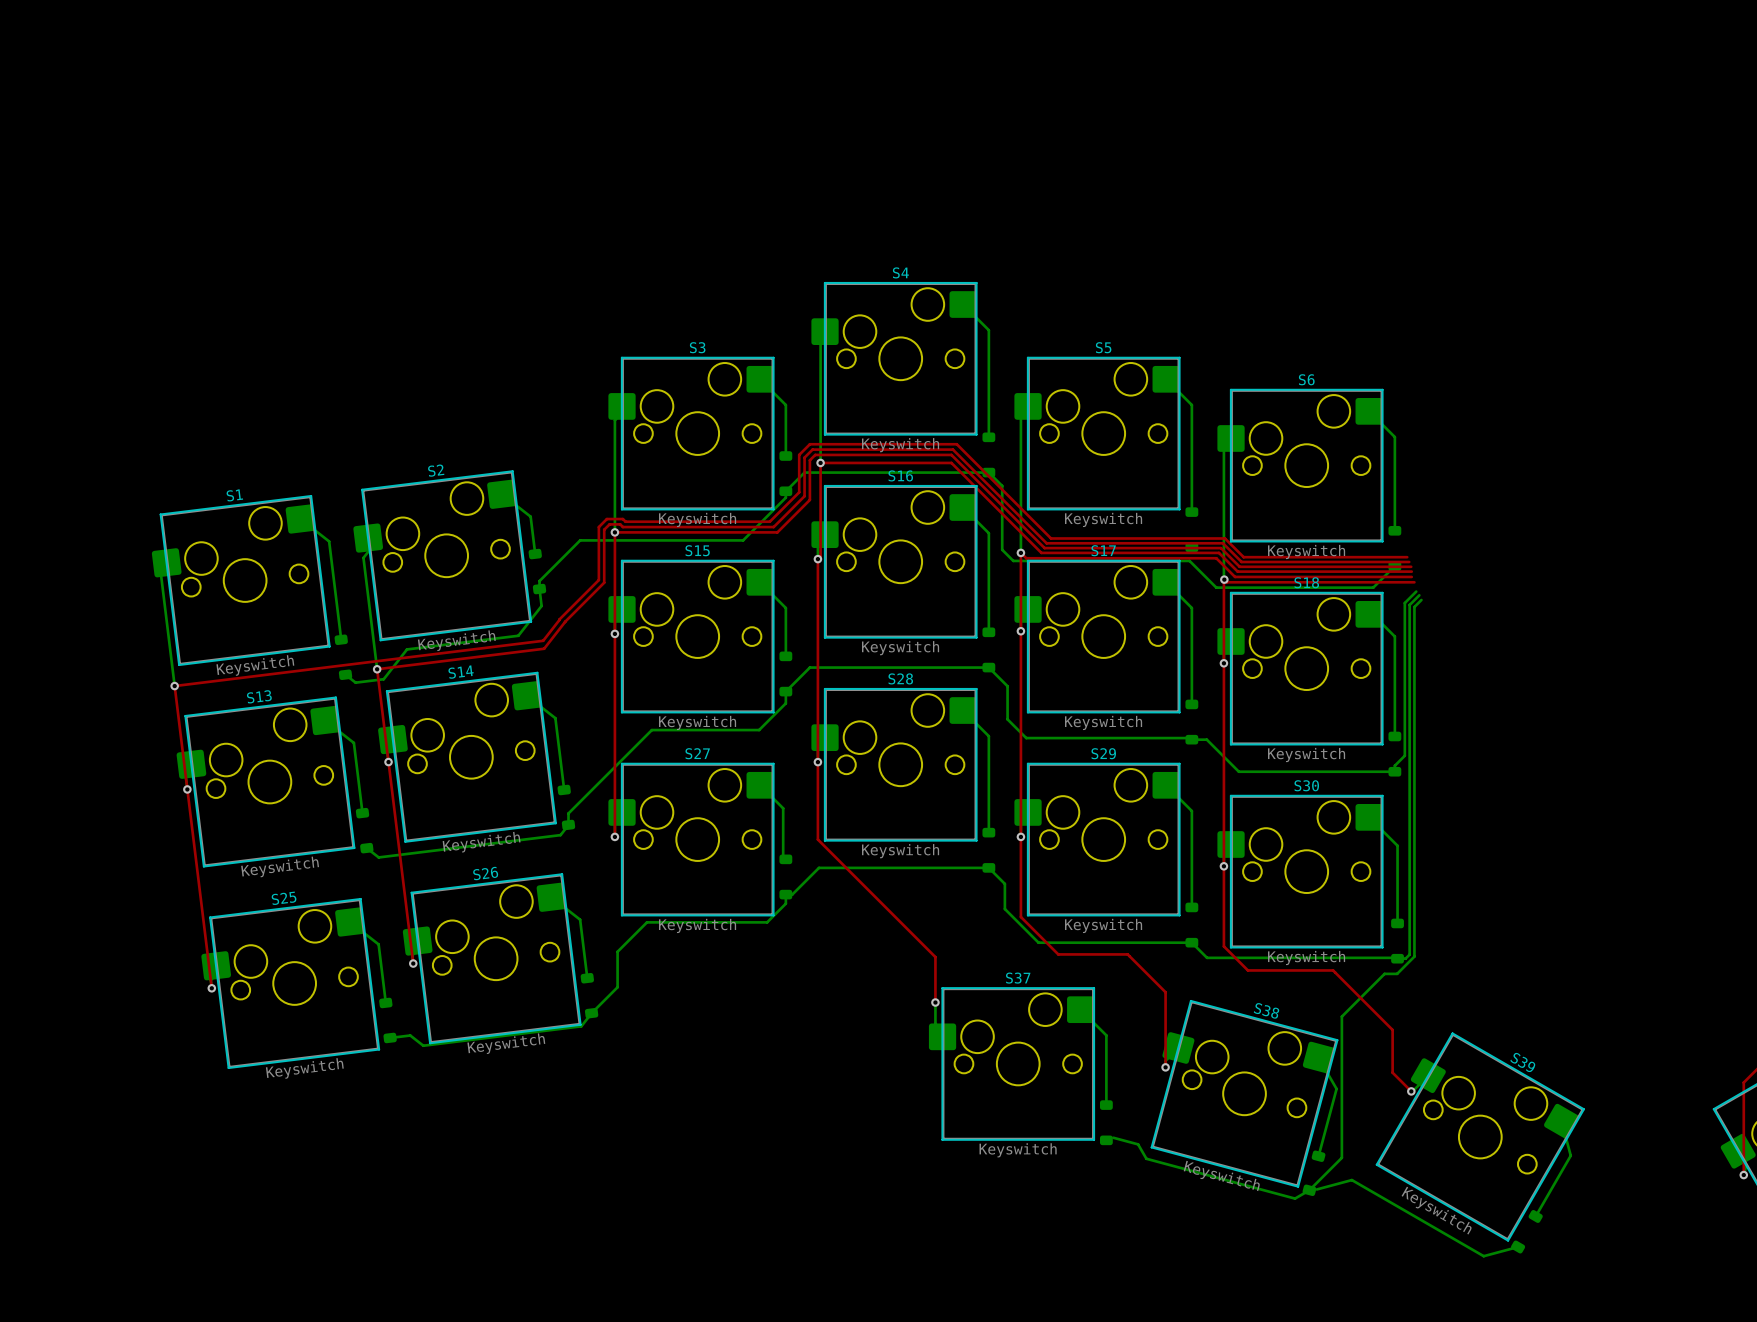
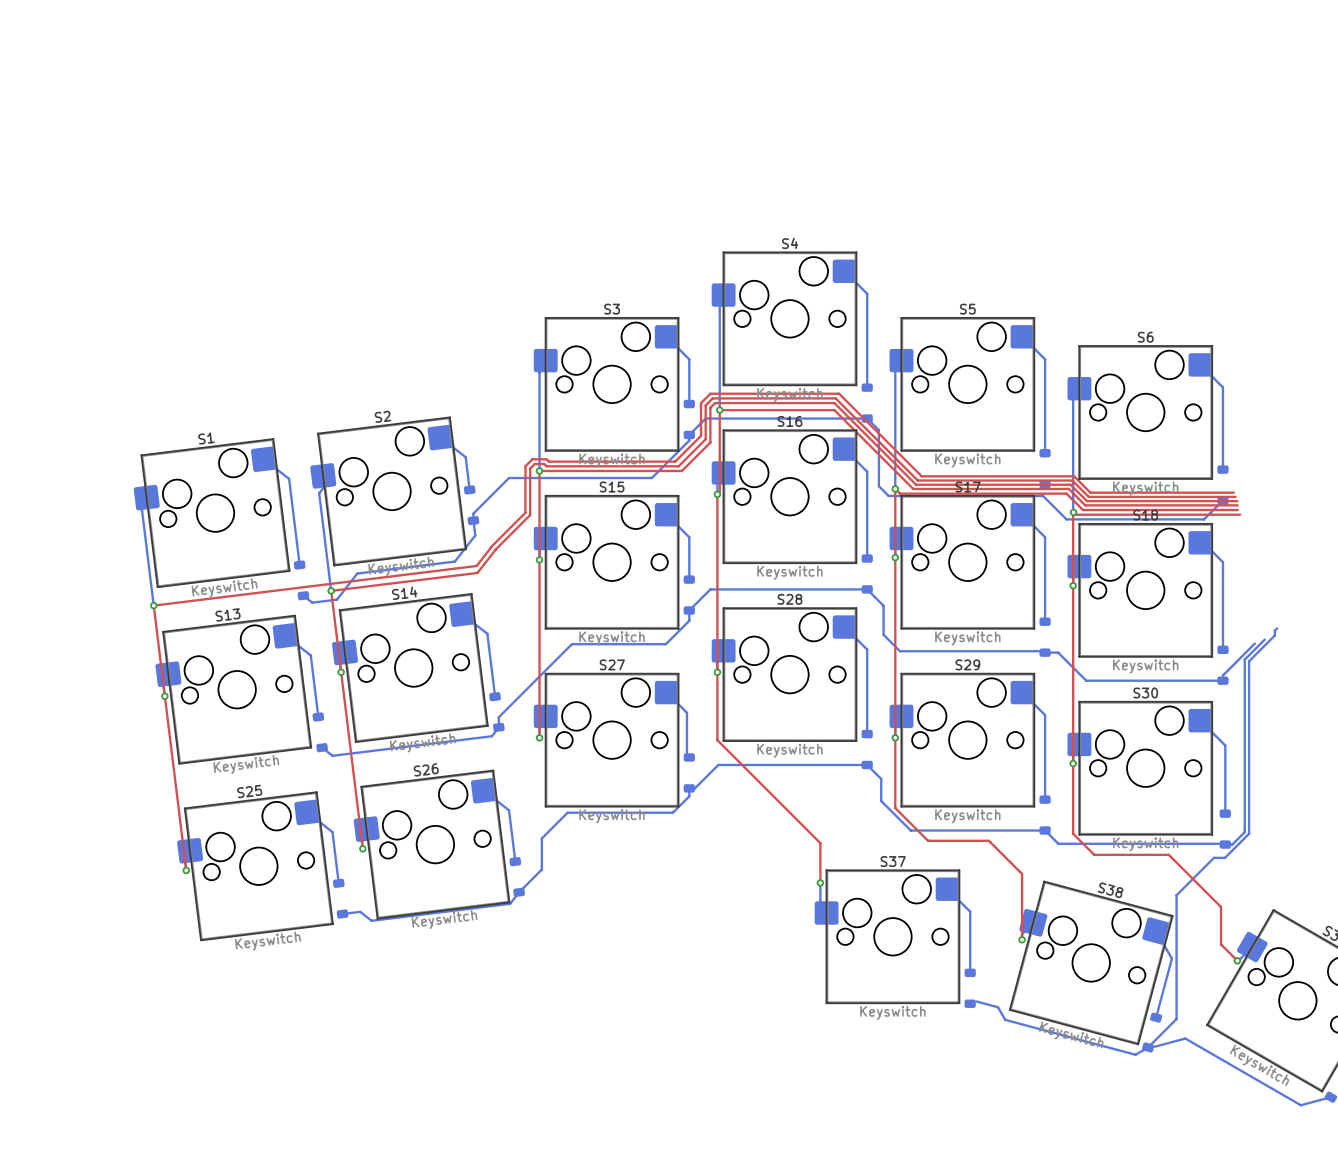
bottom track: (1416, 591) (1404, 603) (1404, 755) -> (1254, 643) (1231, 666)
bottom track: (1419, 595) (1409, 605) (1409, 954) -> (1264, 639) (1244, 659) (1244, 832) (1235, 840)
bottom track: (1421, 600) (1414, 607) (1414, 956) -> (1277, 628) (1274, 635) (1249, 661) (1249, 833) (1240, 842)

